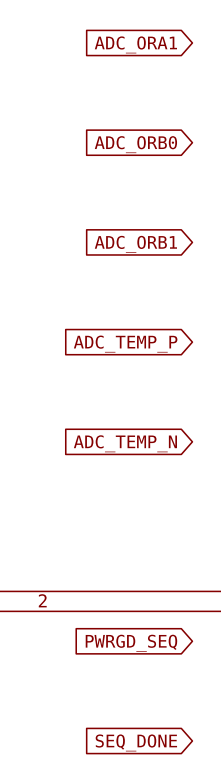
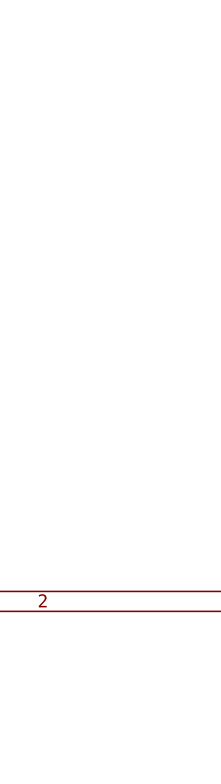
global label: ADC_ORA1 (135, 44) -> none
global label: ADC_ORB0 (135, 144) -> none
global label: ADC_ORB1 (135, 244) -> none
global label: ADC_TEMP_P (125, 344) -> none
global label: ADC_TEMP_N (125, 443) -> none
global label: PWRGD_SEQ (131, 643) -> none
global label: SEQ_DONE (136, 742) -> none

